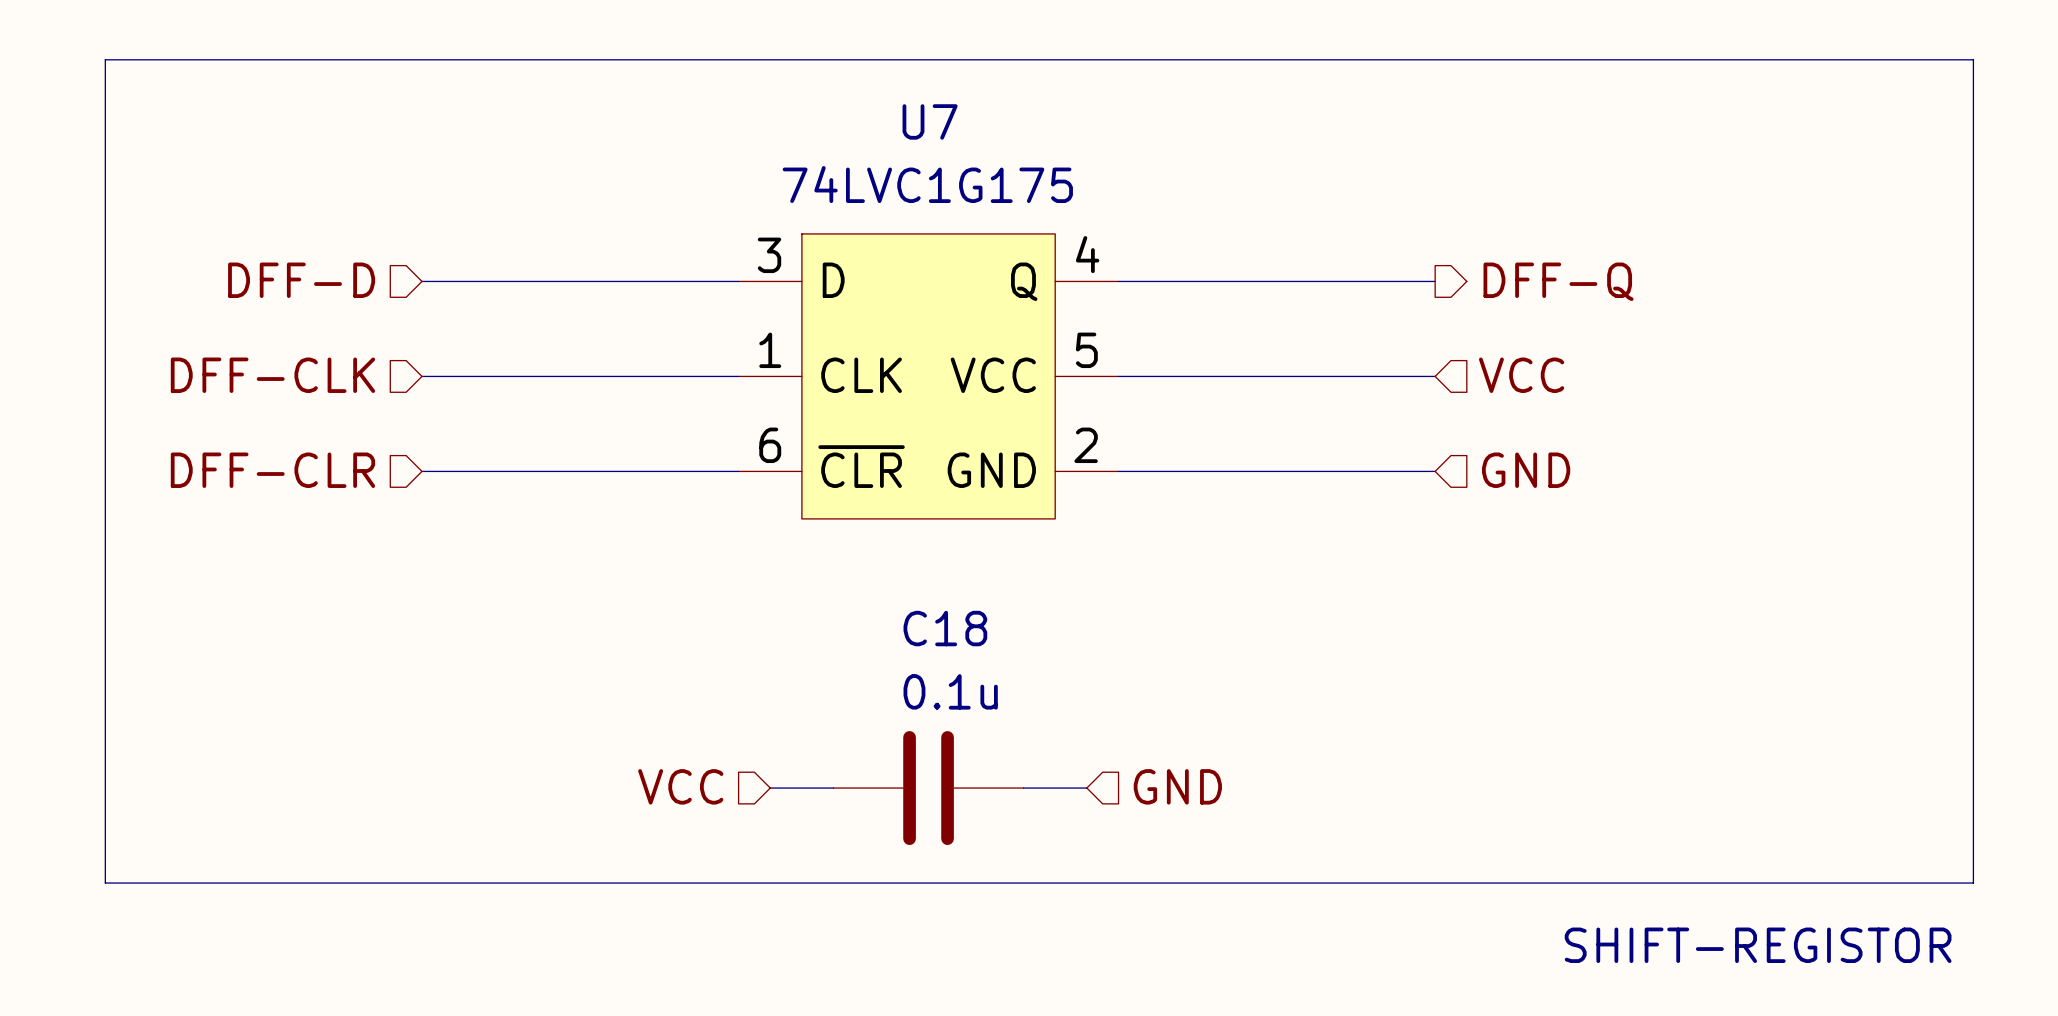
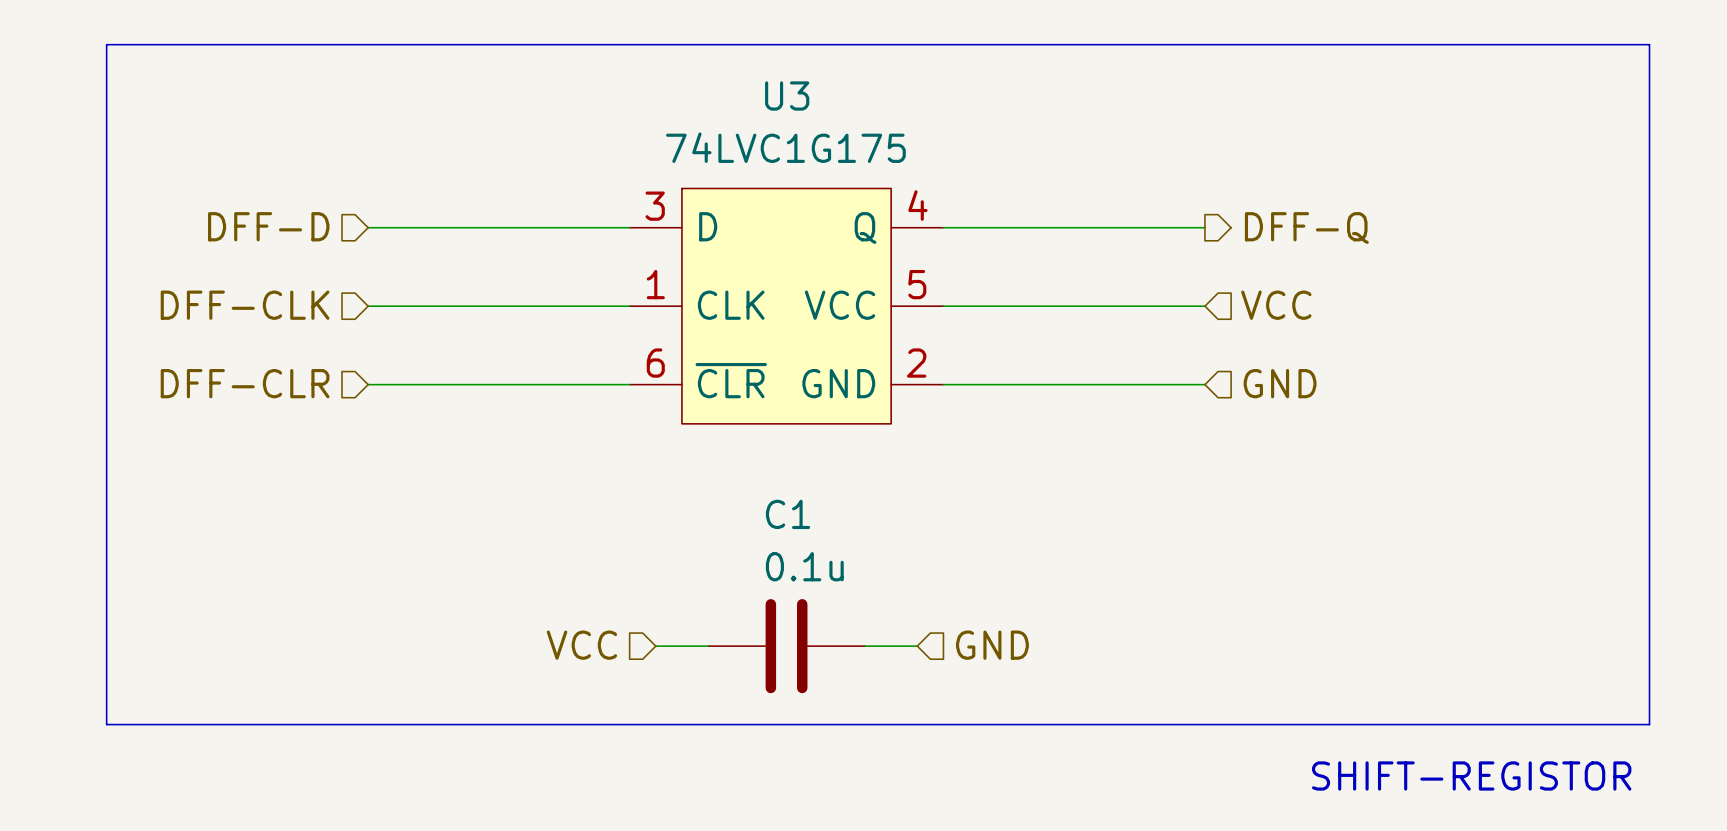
U7 name: U7 (930, 121) -> U3 (787, 95)
C18 name: C18 (945, 628) -> C1 (787, 514)

